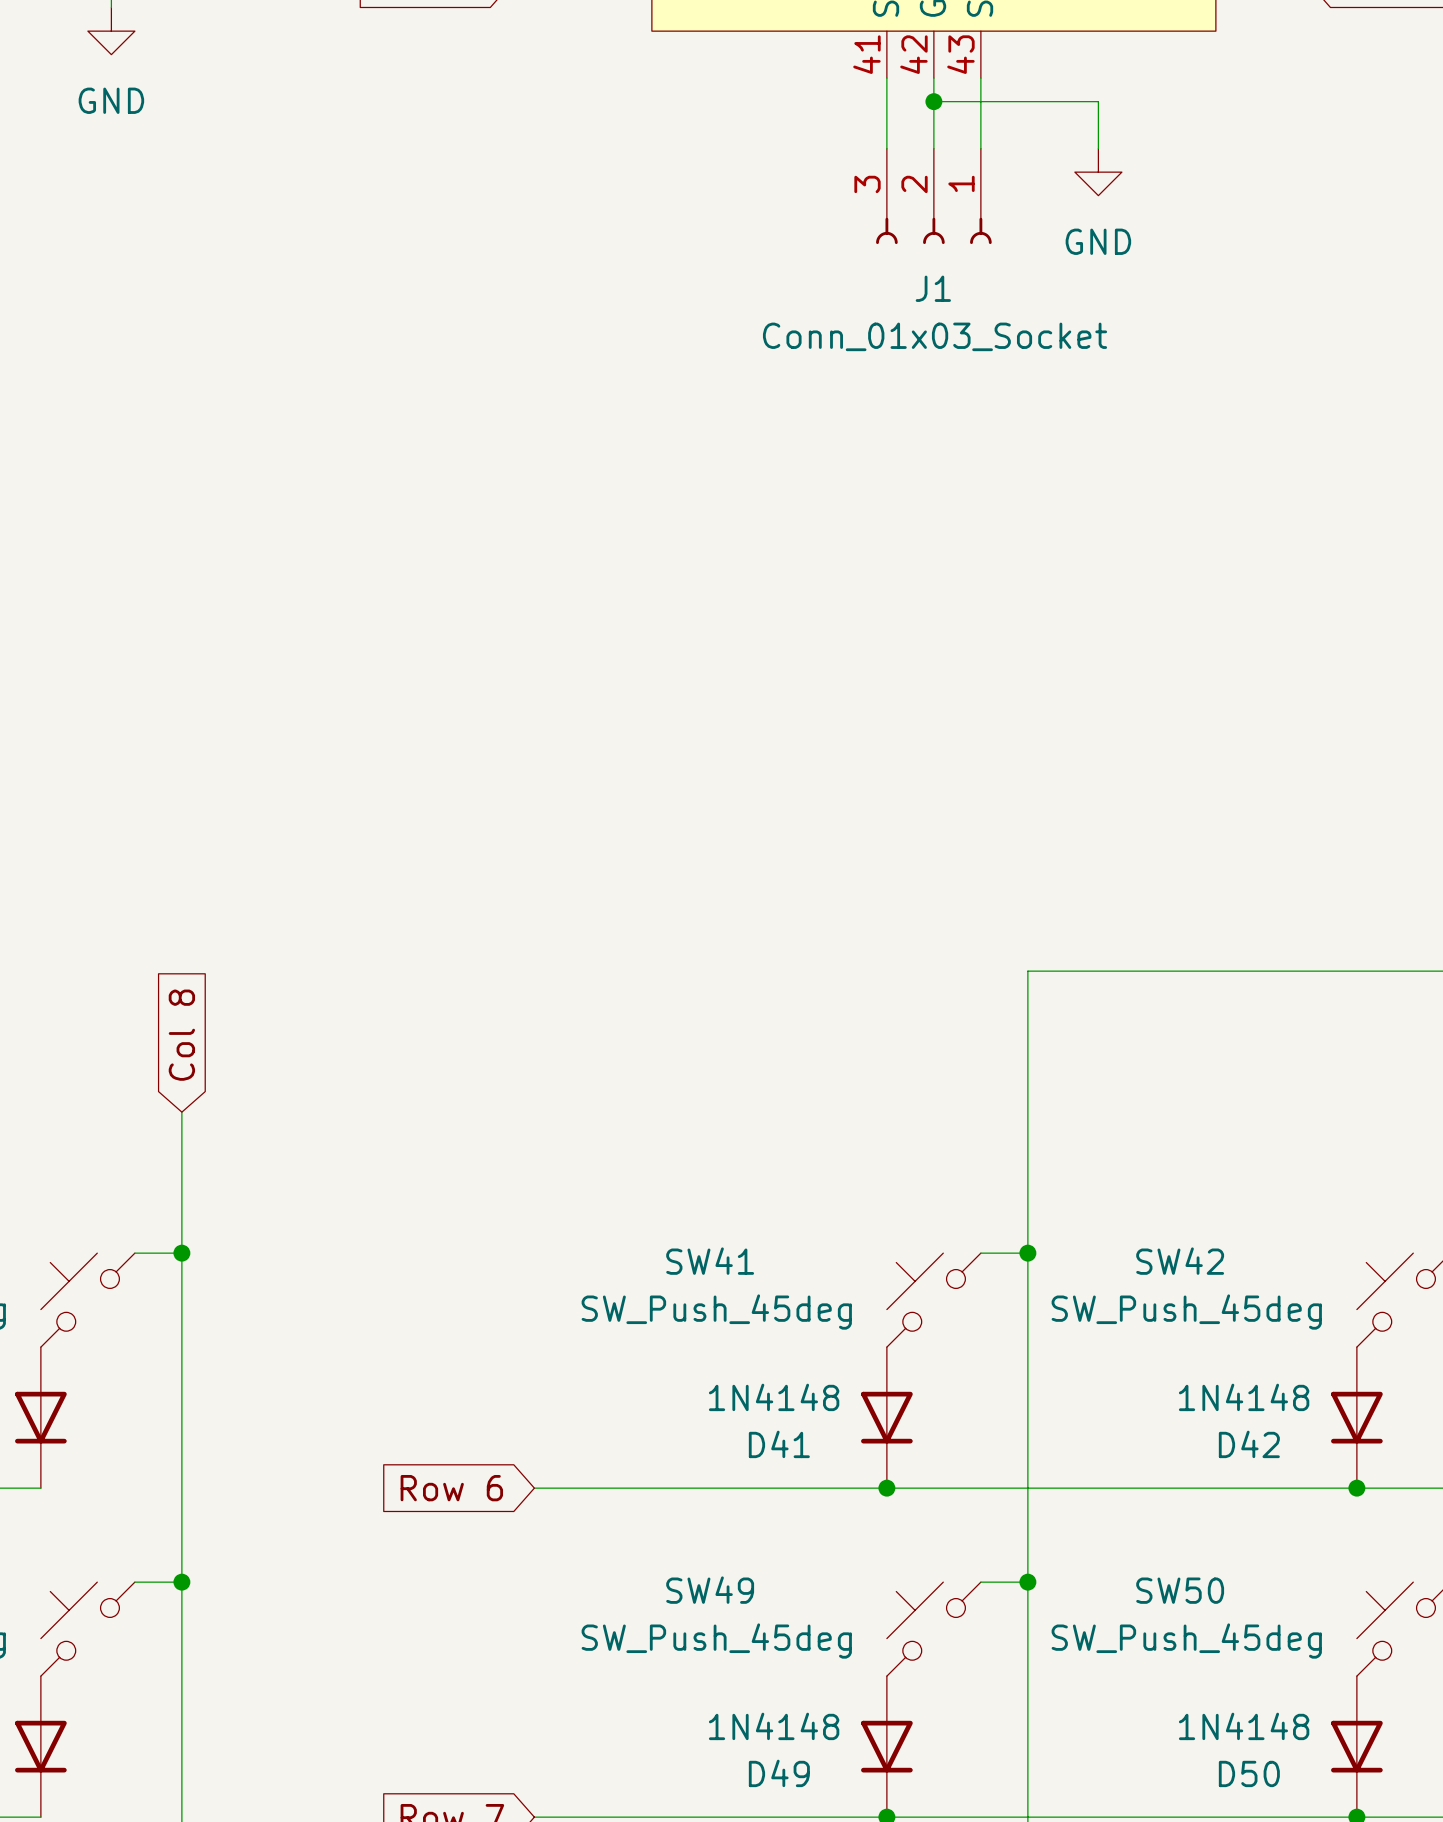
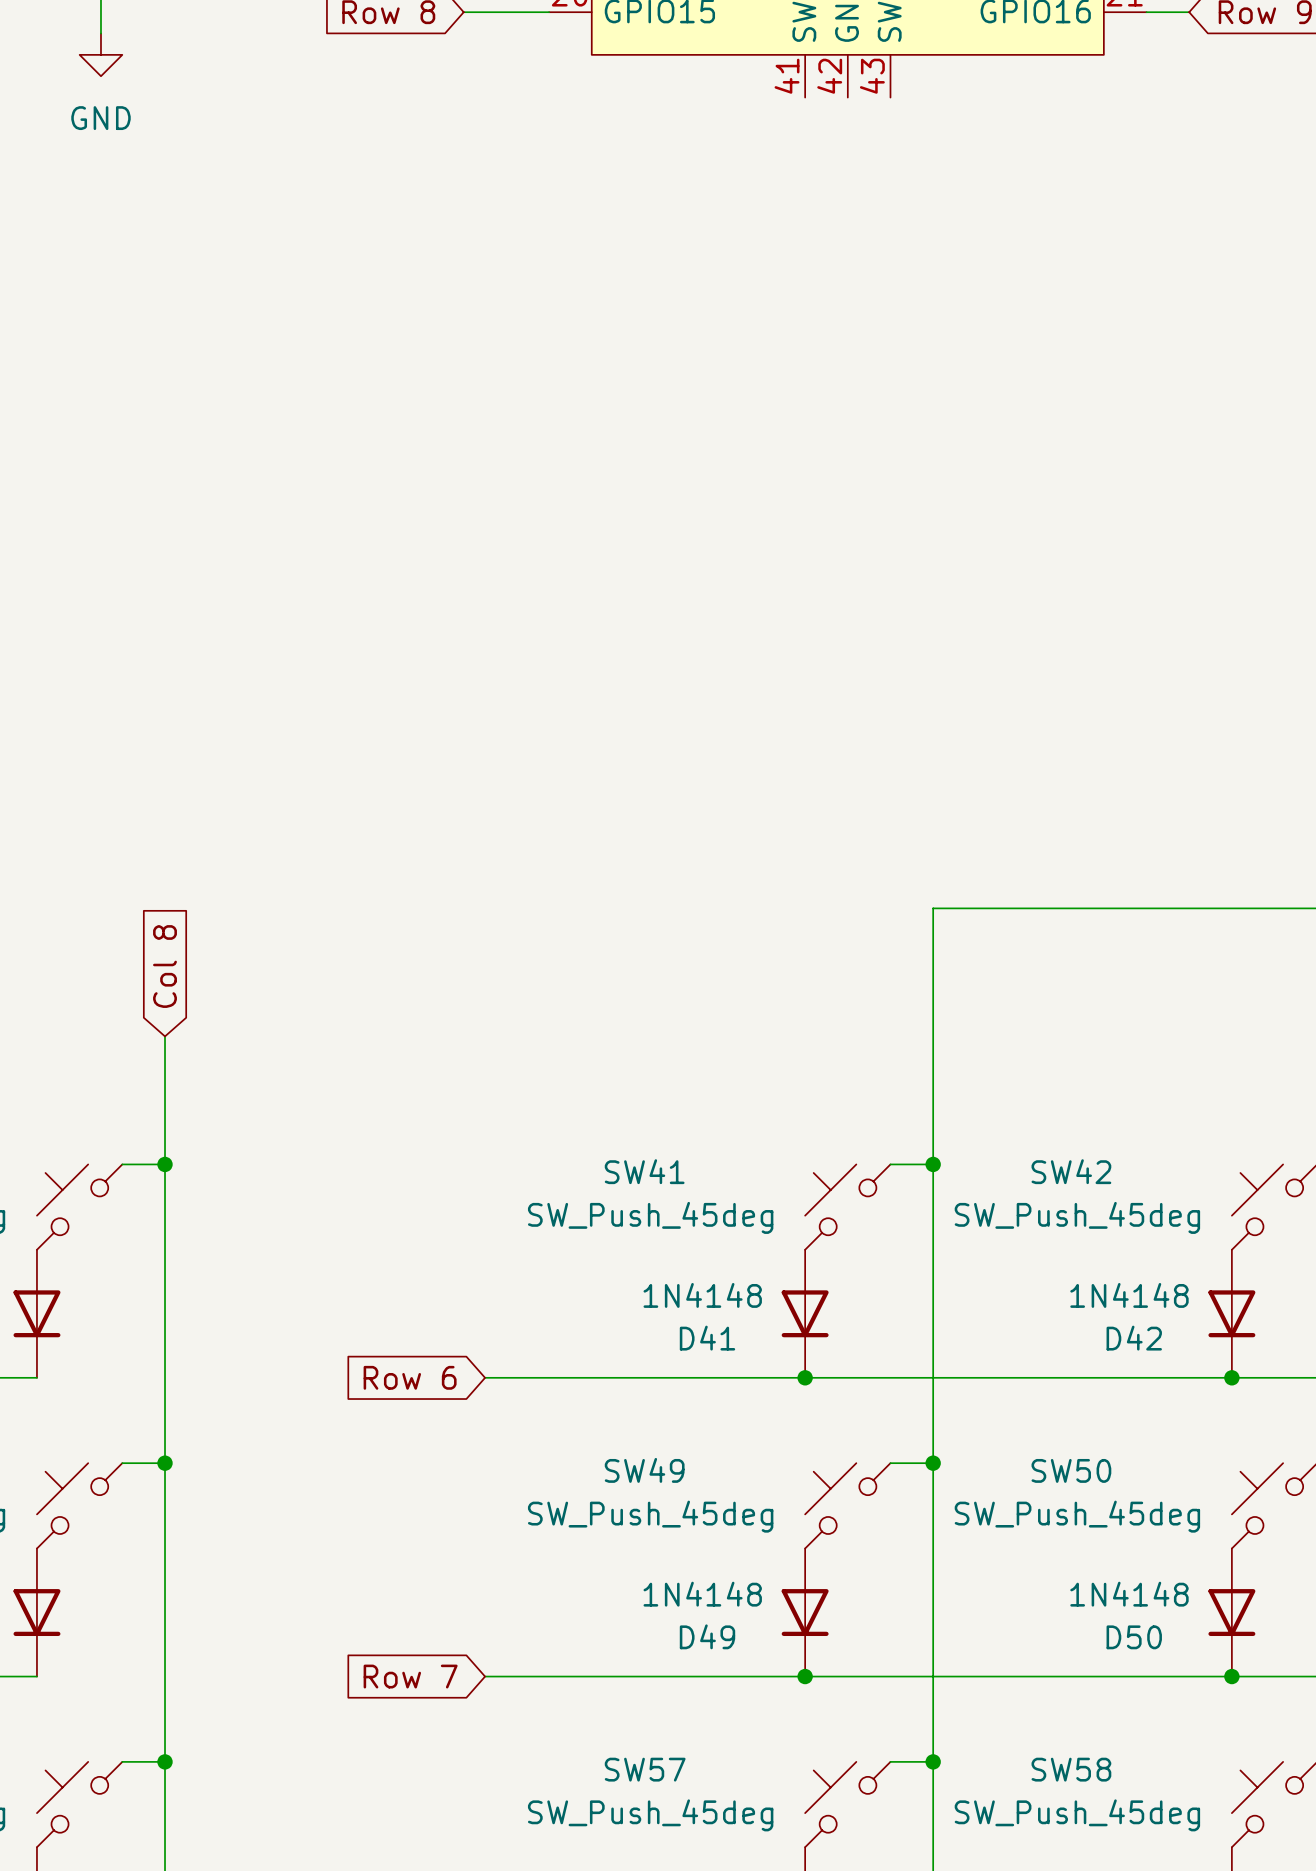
wire: (886, 78) (886, 148) -> none
wire: (933, 78) (933, 148) -> none
wire: (980, 78) (980, 148) -> none
wire: (933, 101) (1098, 101) (1098, 148) -> none
junction: (933, 101) -> none
power symbol: GND (1098, 172) -> none
J1: Conn_01x03_Socket (933, 196) -> none

